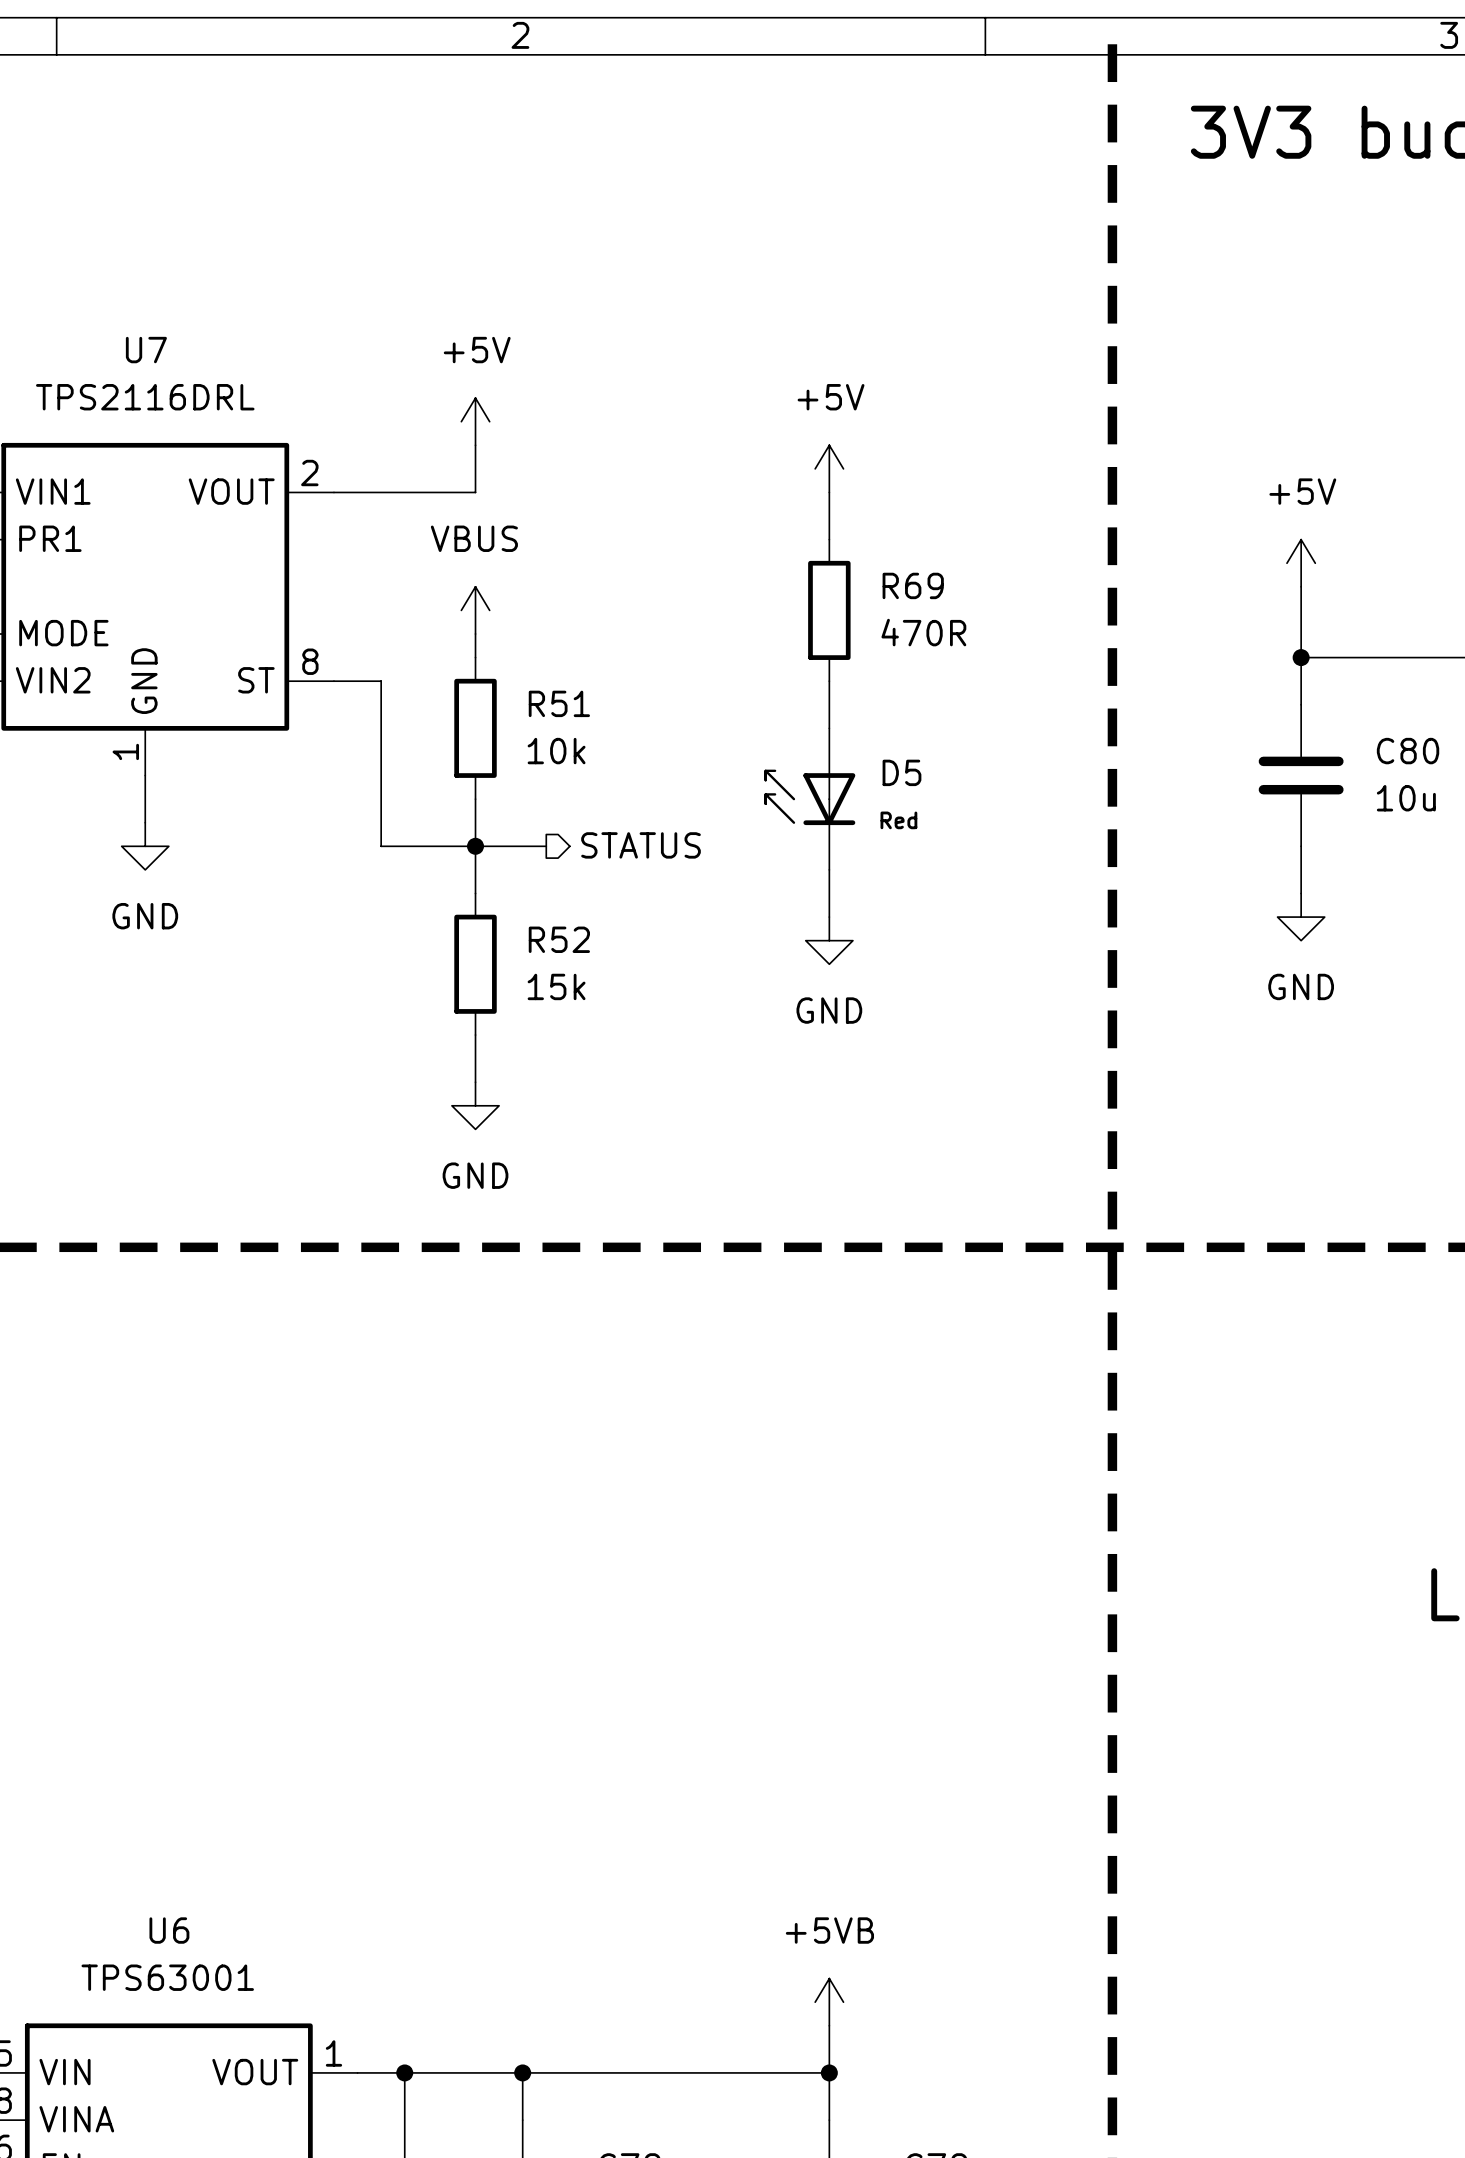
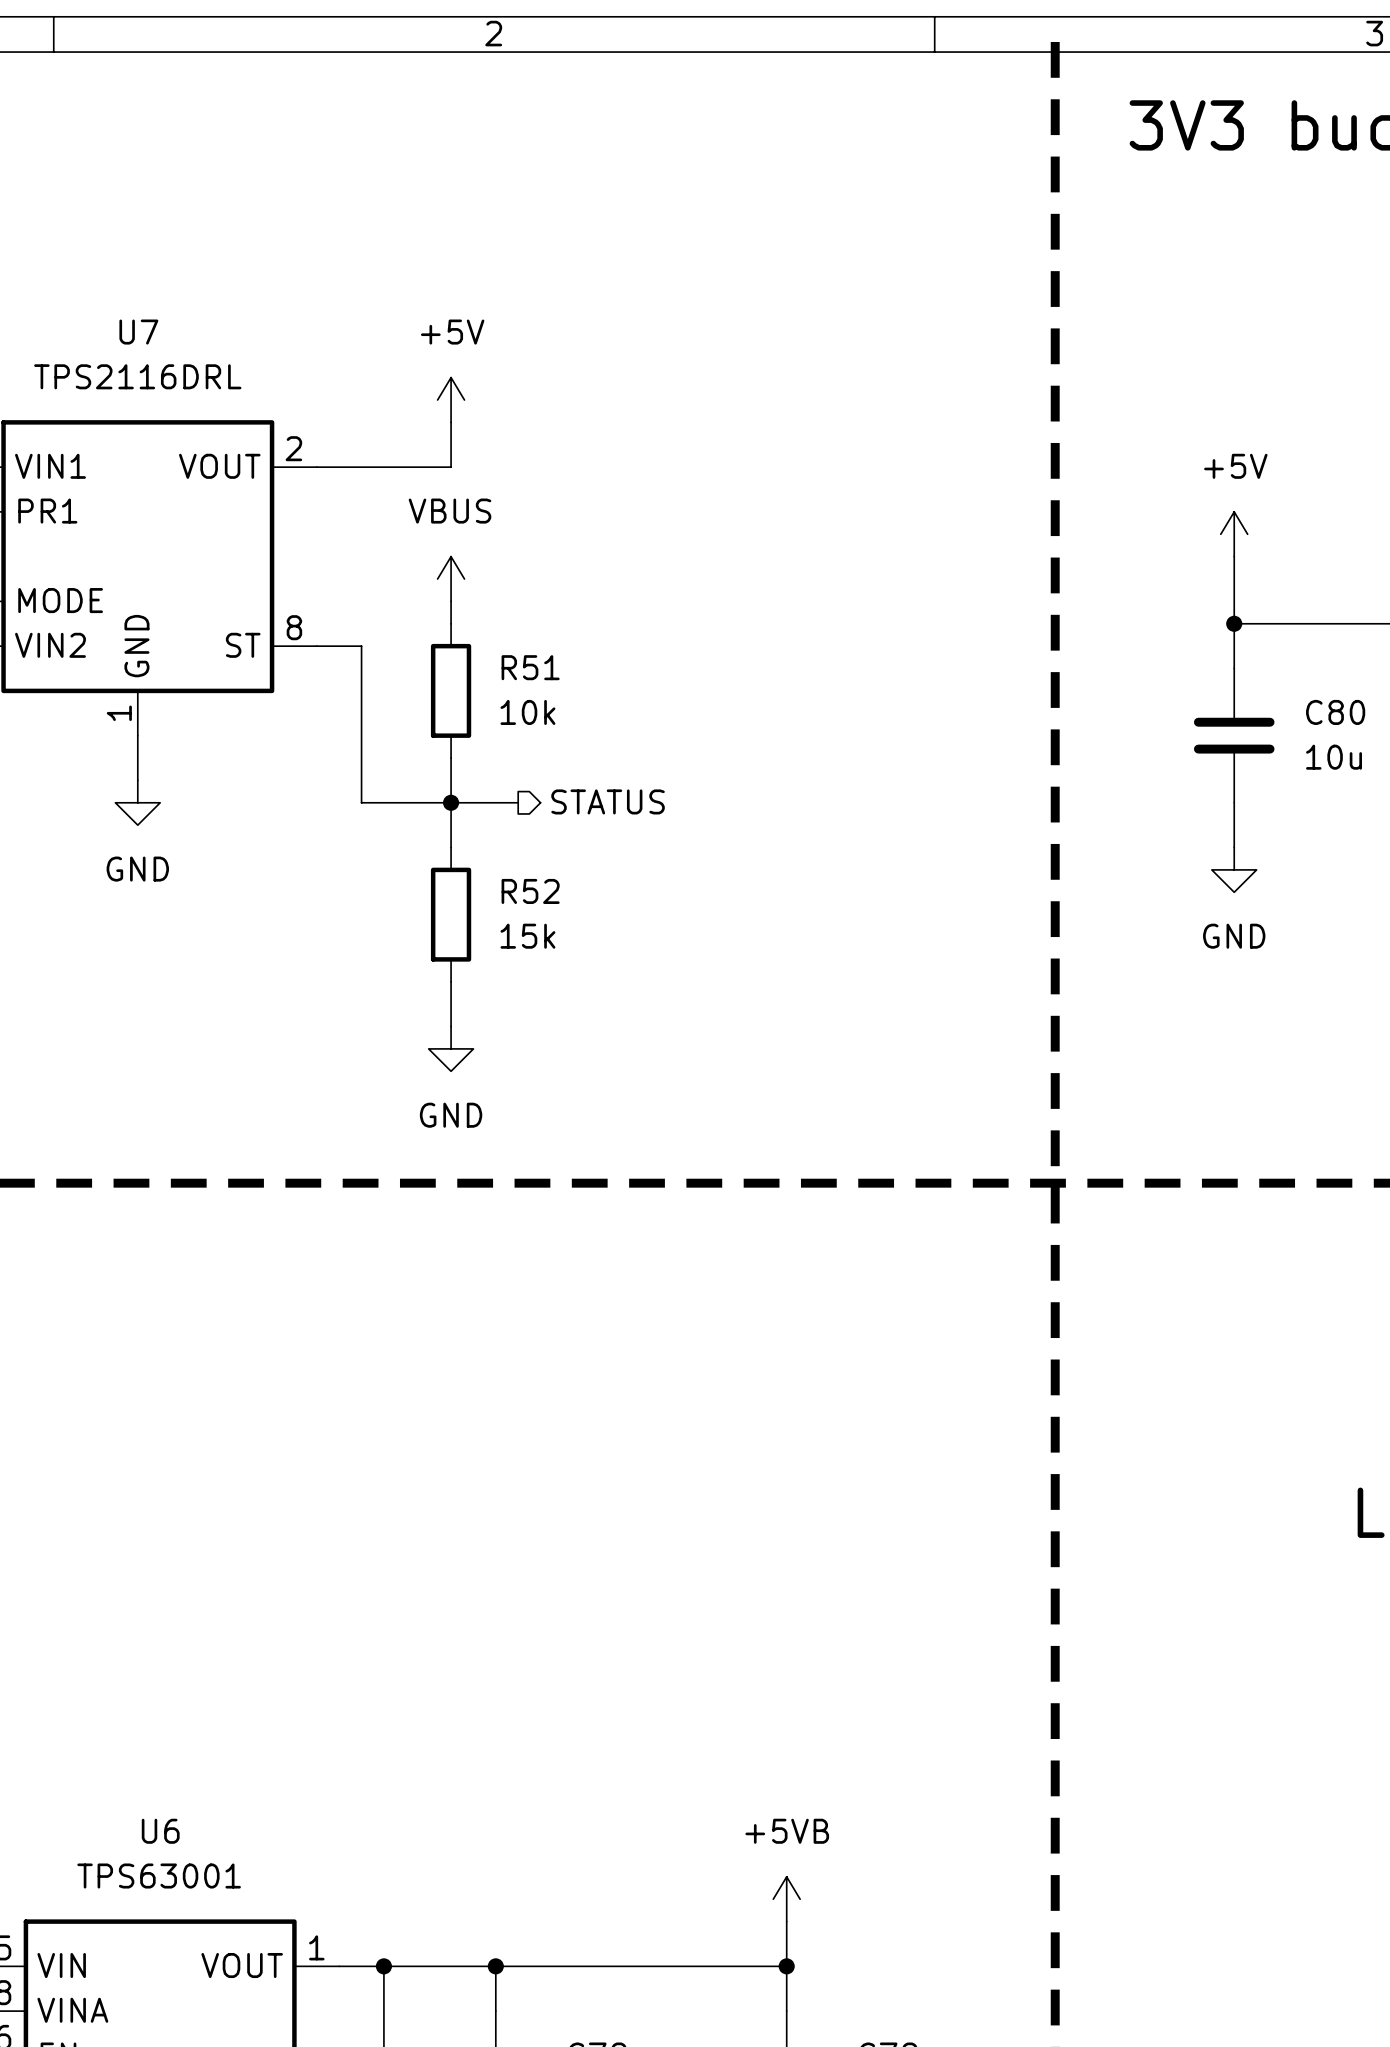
power symbol: +5V (829, 468) -> none
wire: (829, 492) (829, 539) -> none
R69: 470R (829, 610) -> none
wire: (829, 681) (829, 728) -> none
D5: Red (809, 799) -> none
wire: (829, 869) (829, 917) -> none
power symbol: GND (829, 940) -> none

